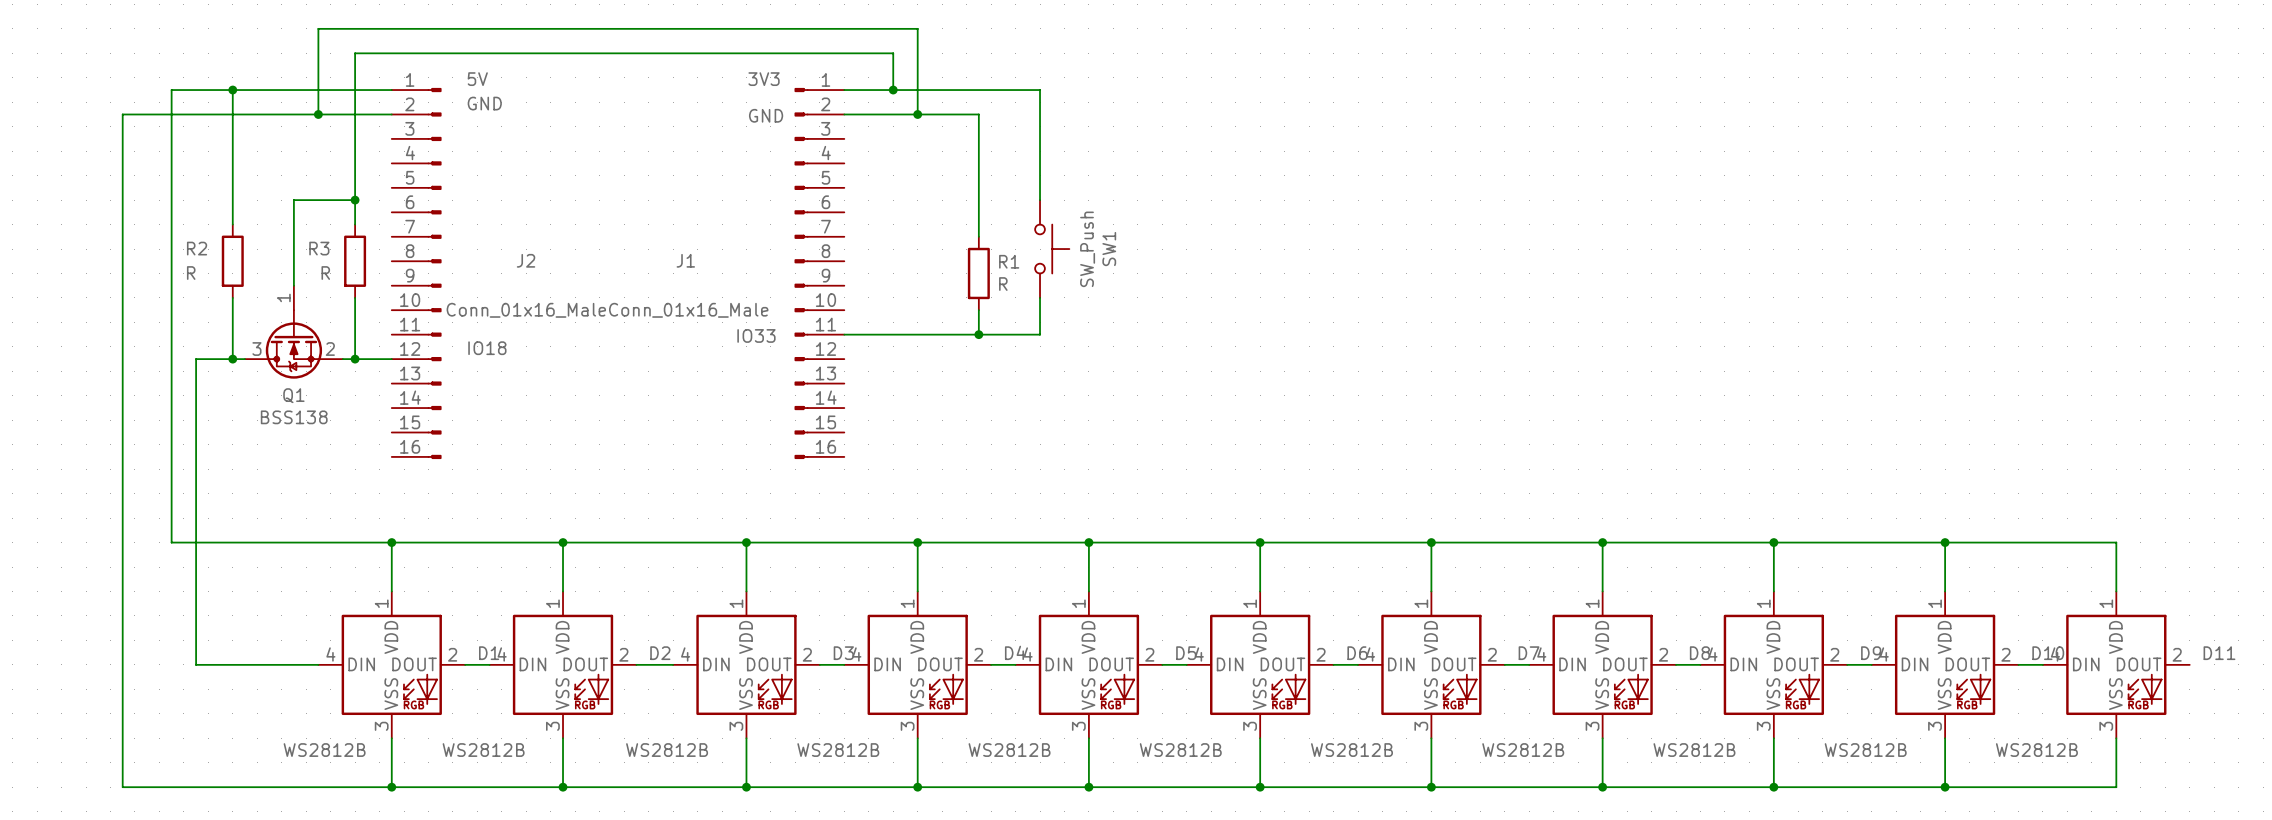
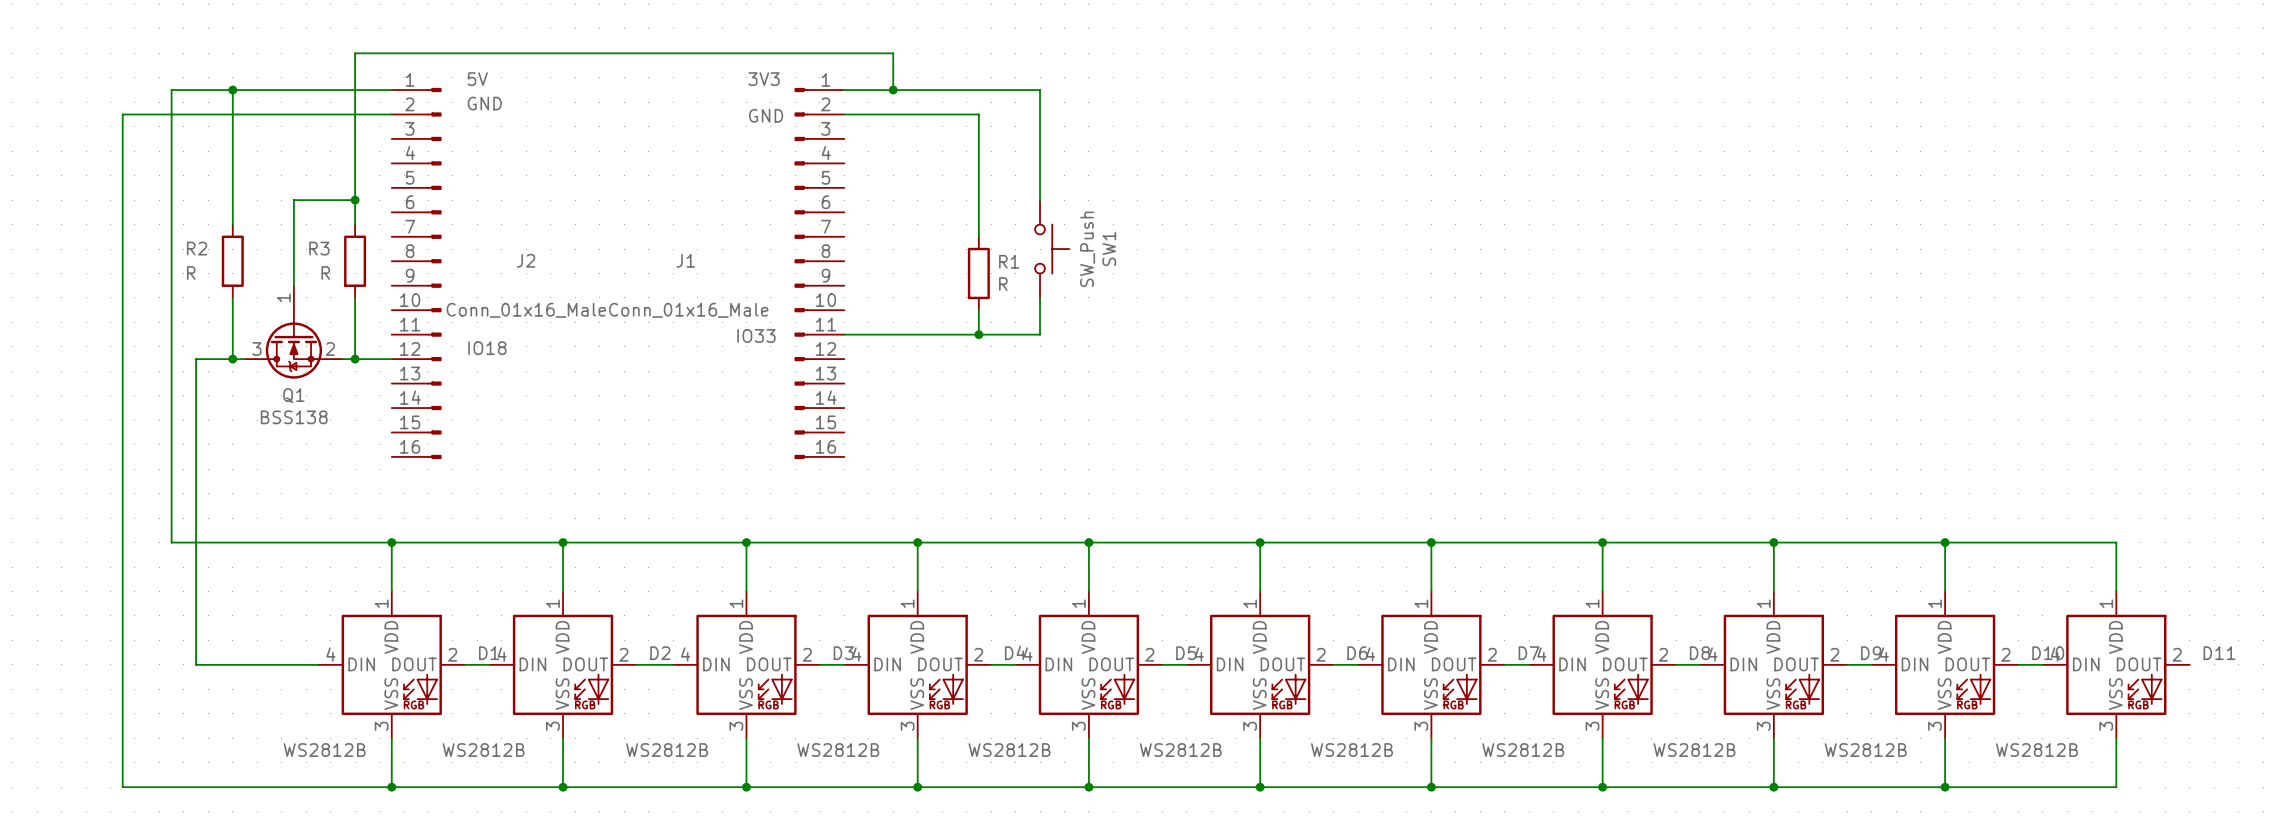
wire: (318, 114) (318, 28) (917, 28) (917, 114) -> none
junction: (318, 114) -> none
junction: (917, 114) -> none

